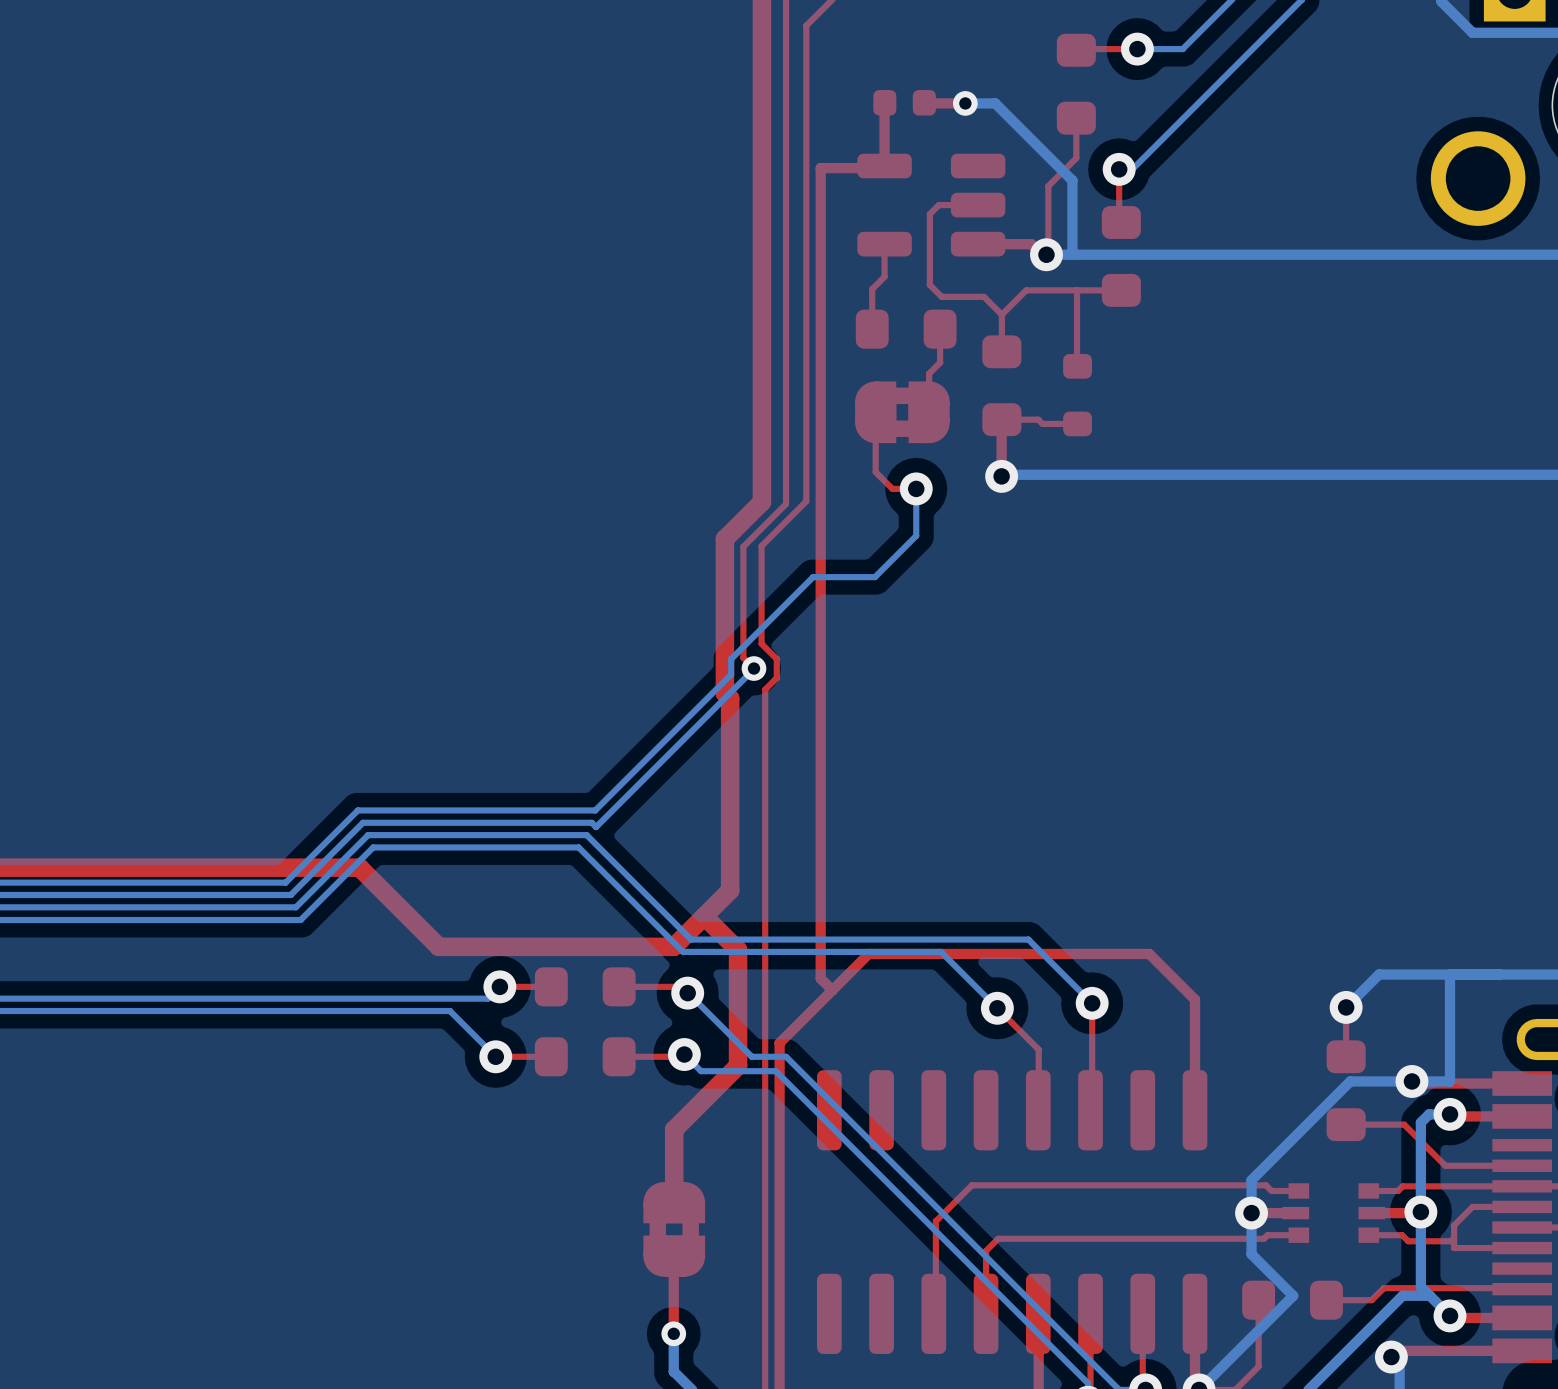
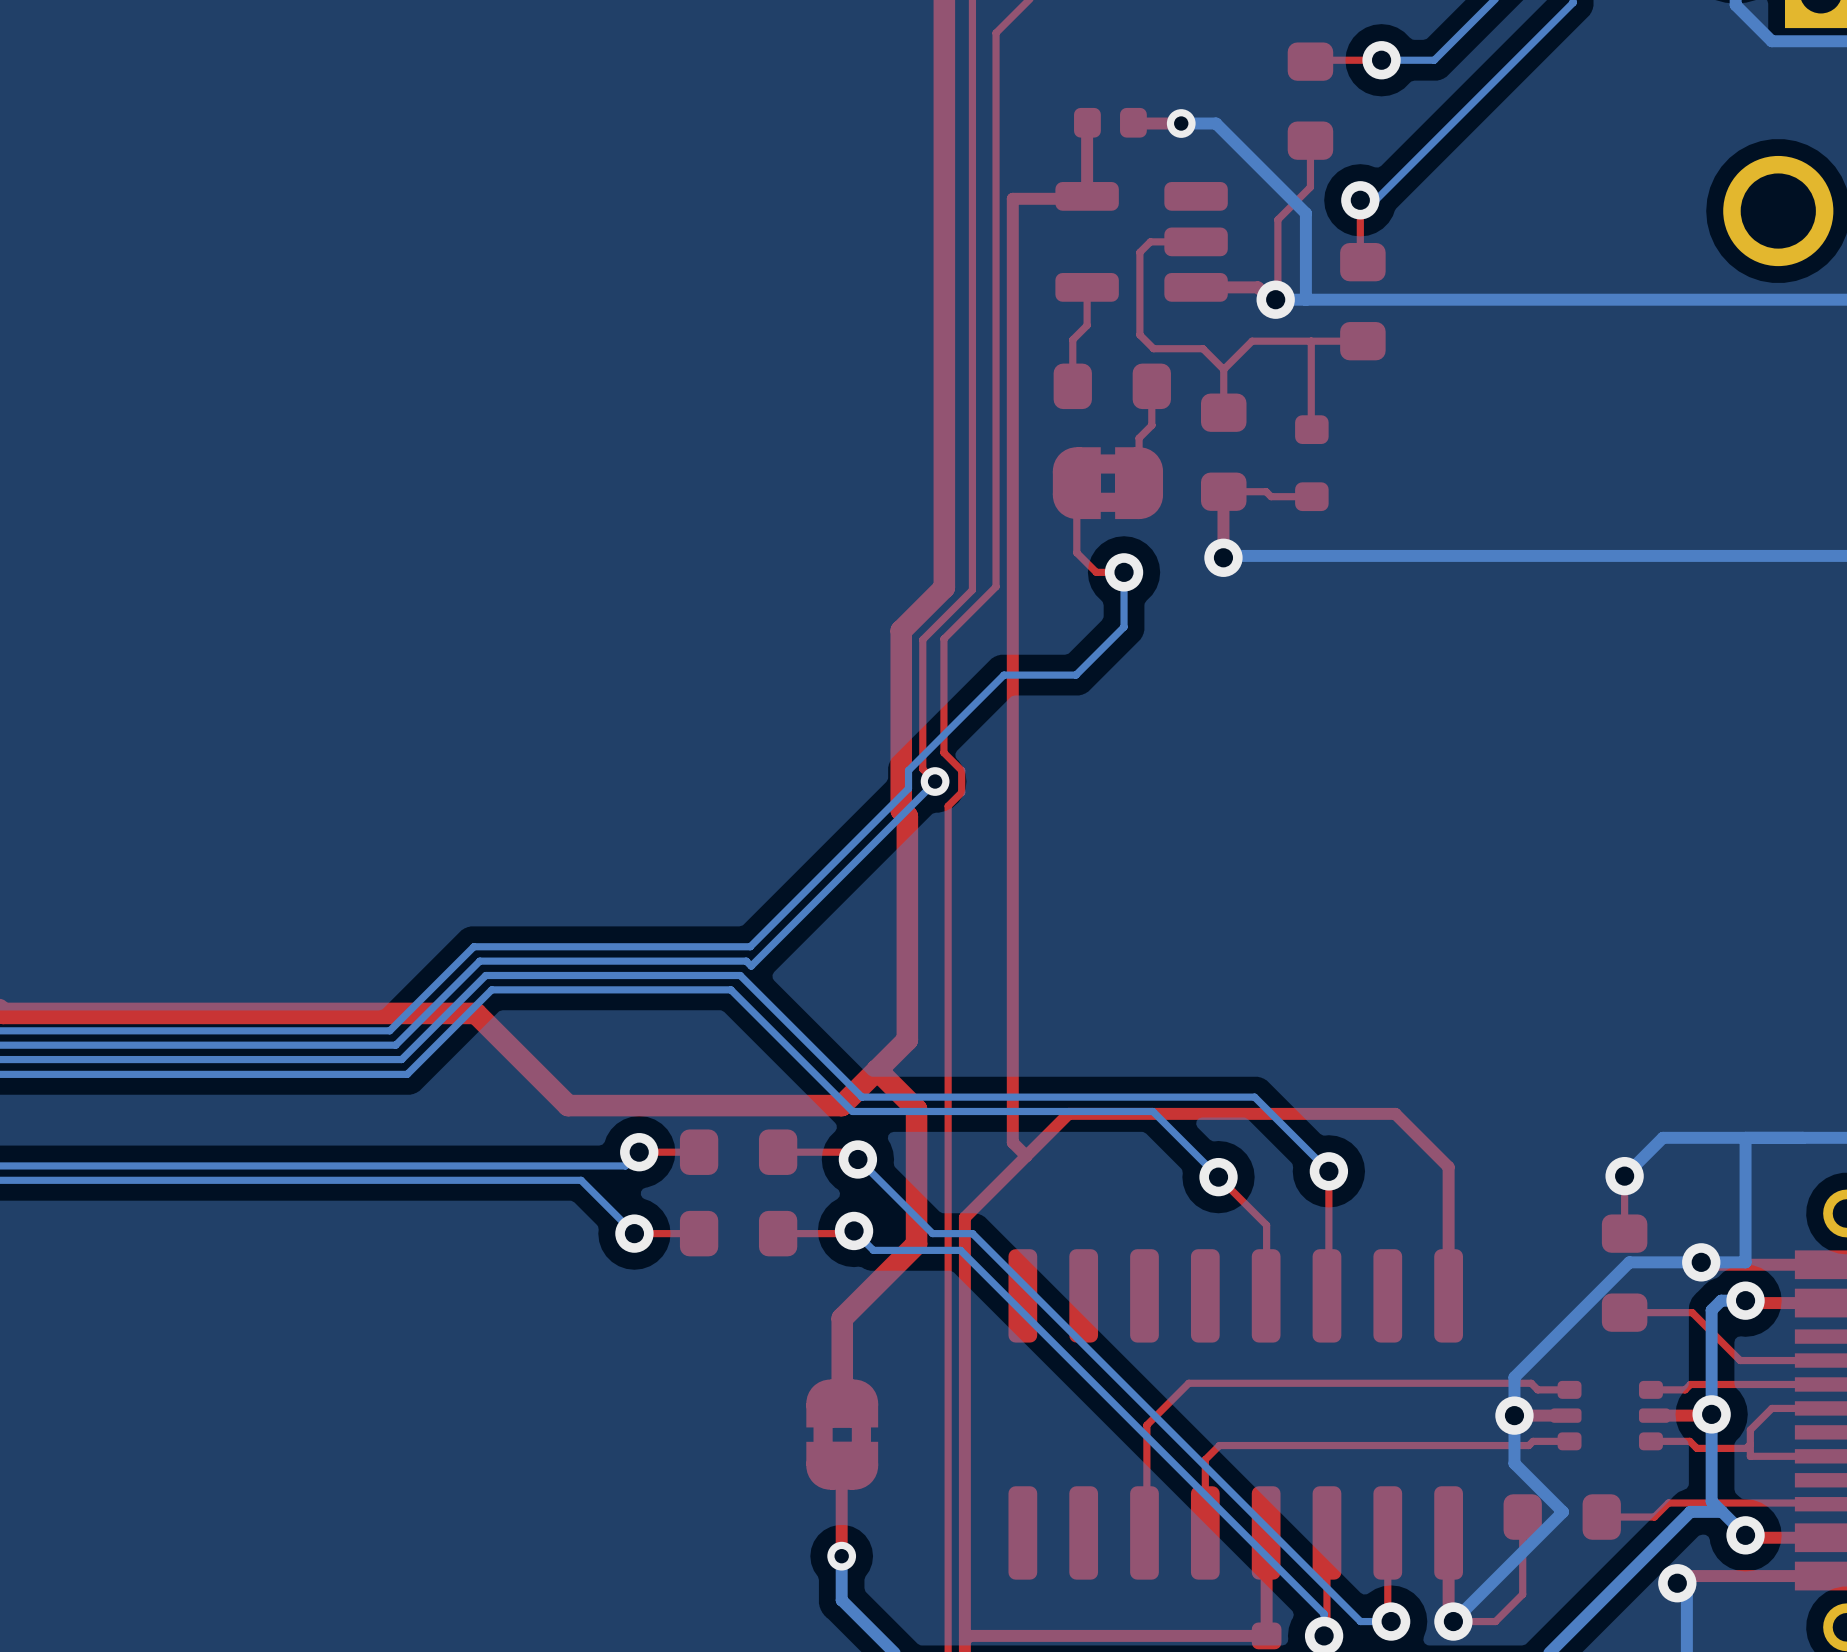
part footprint: [1282, 1183, 1386, 1243] -> [1550, 1380, 1671, 1451]

